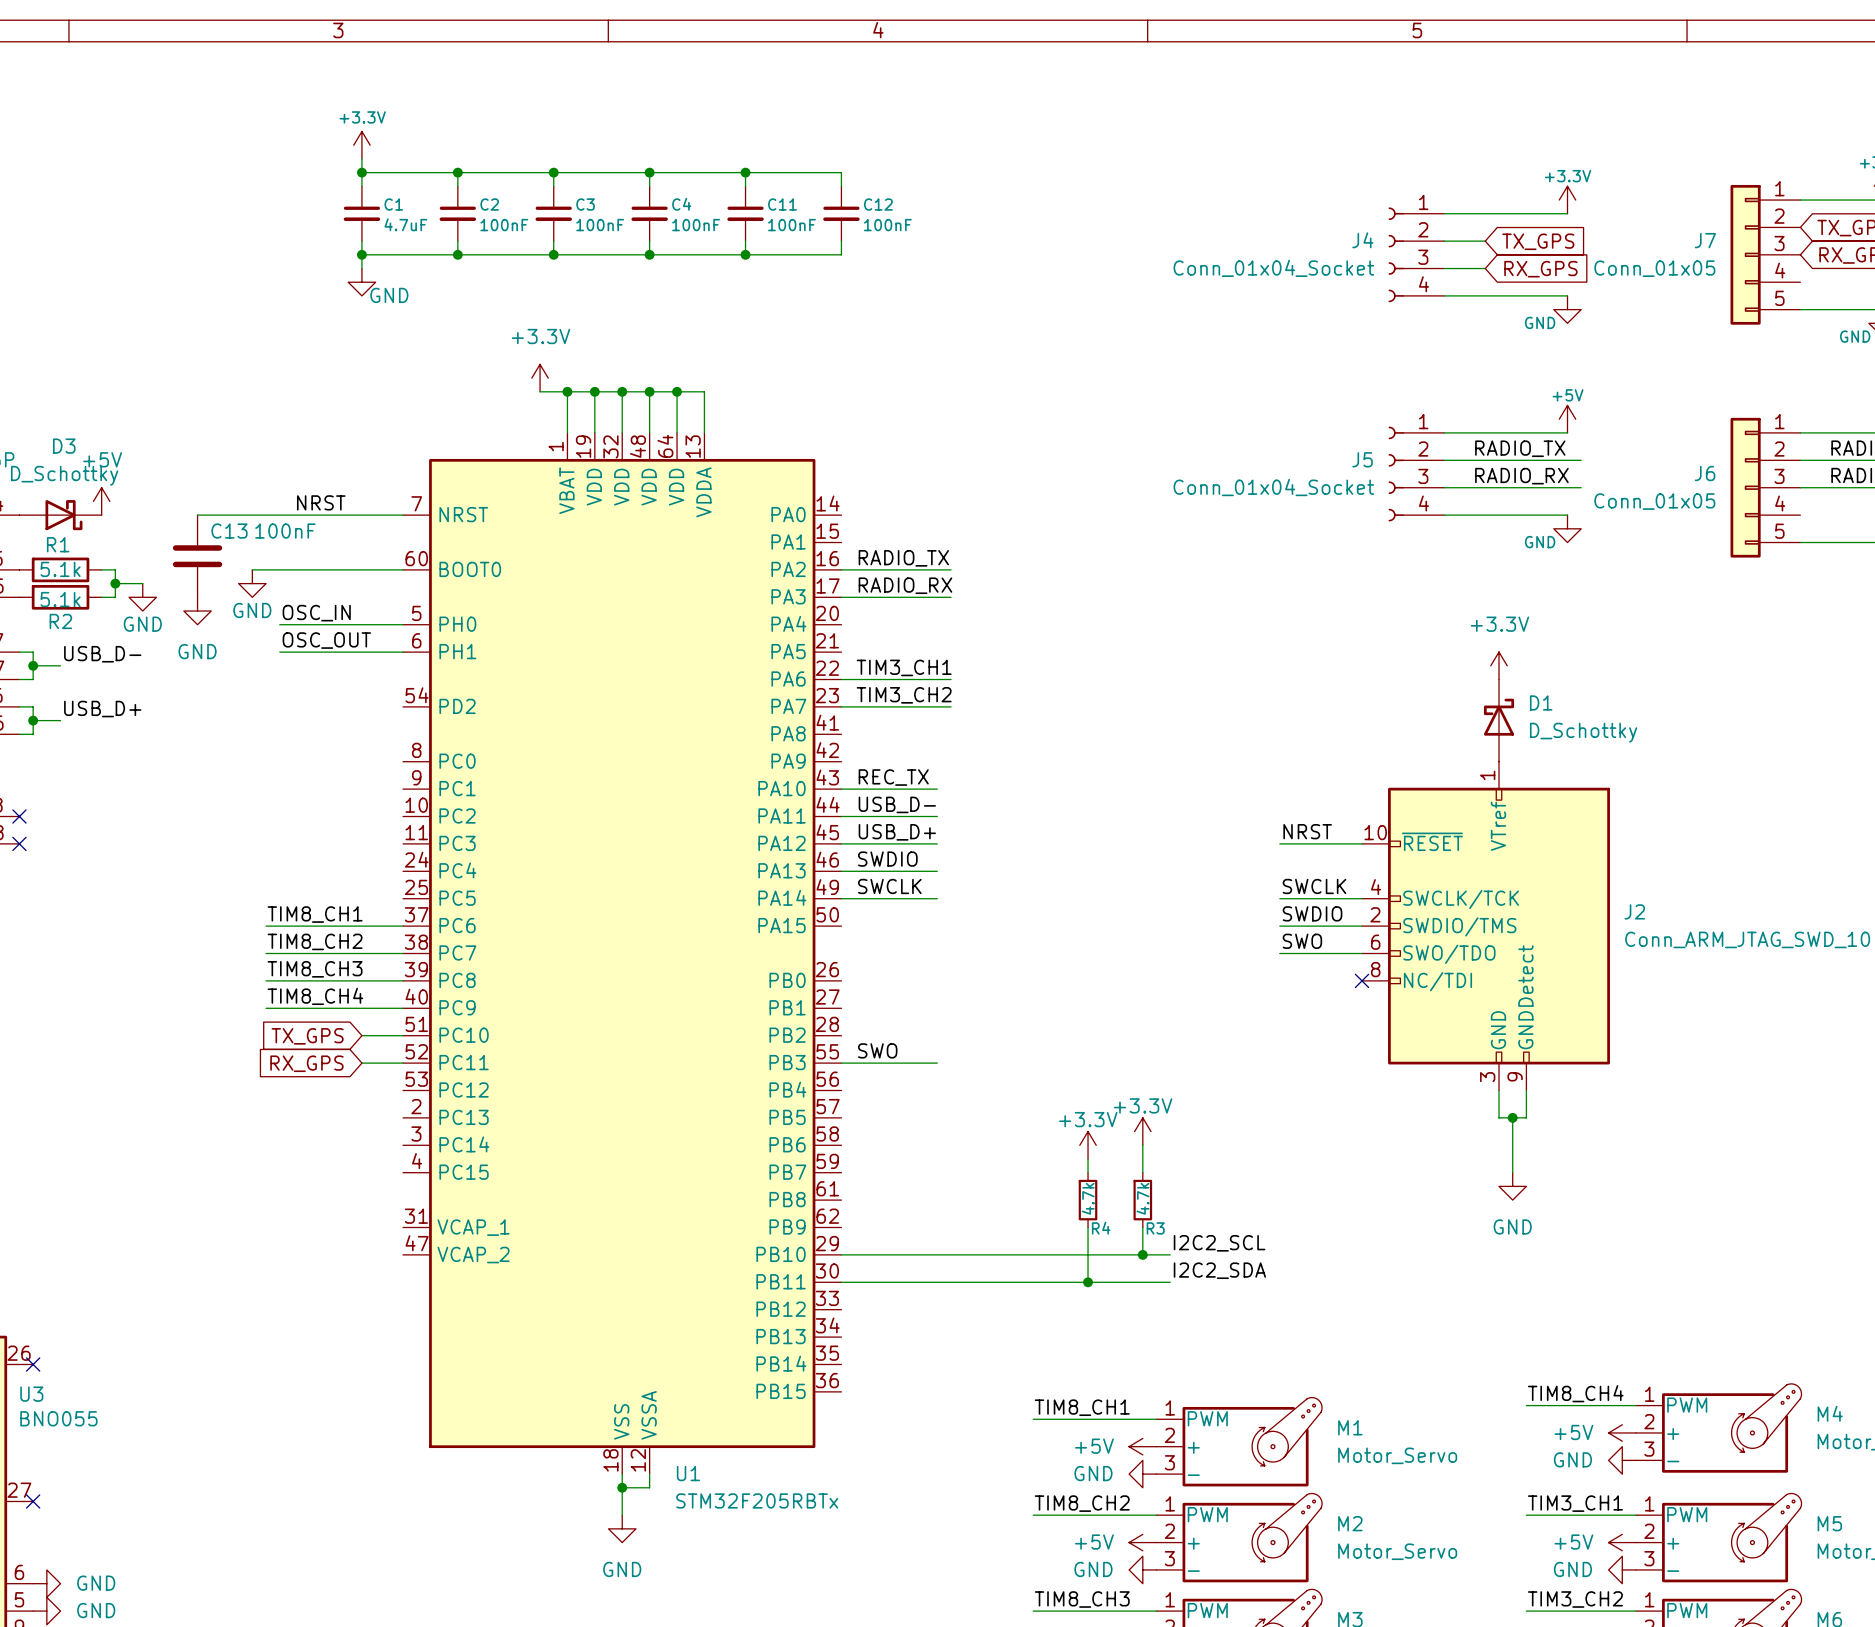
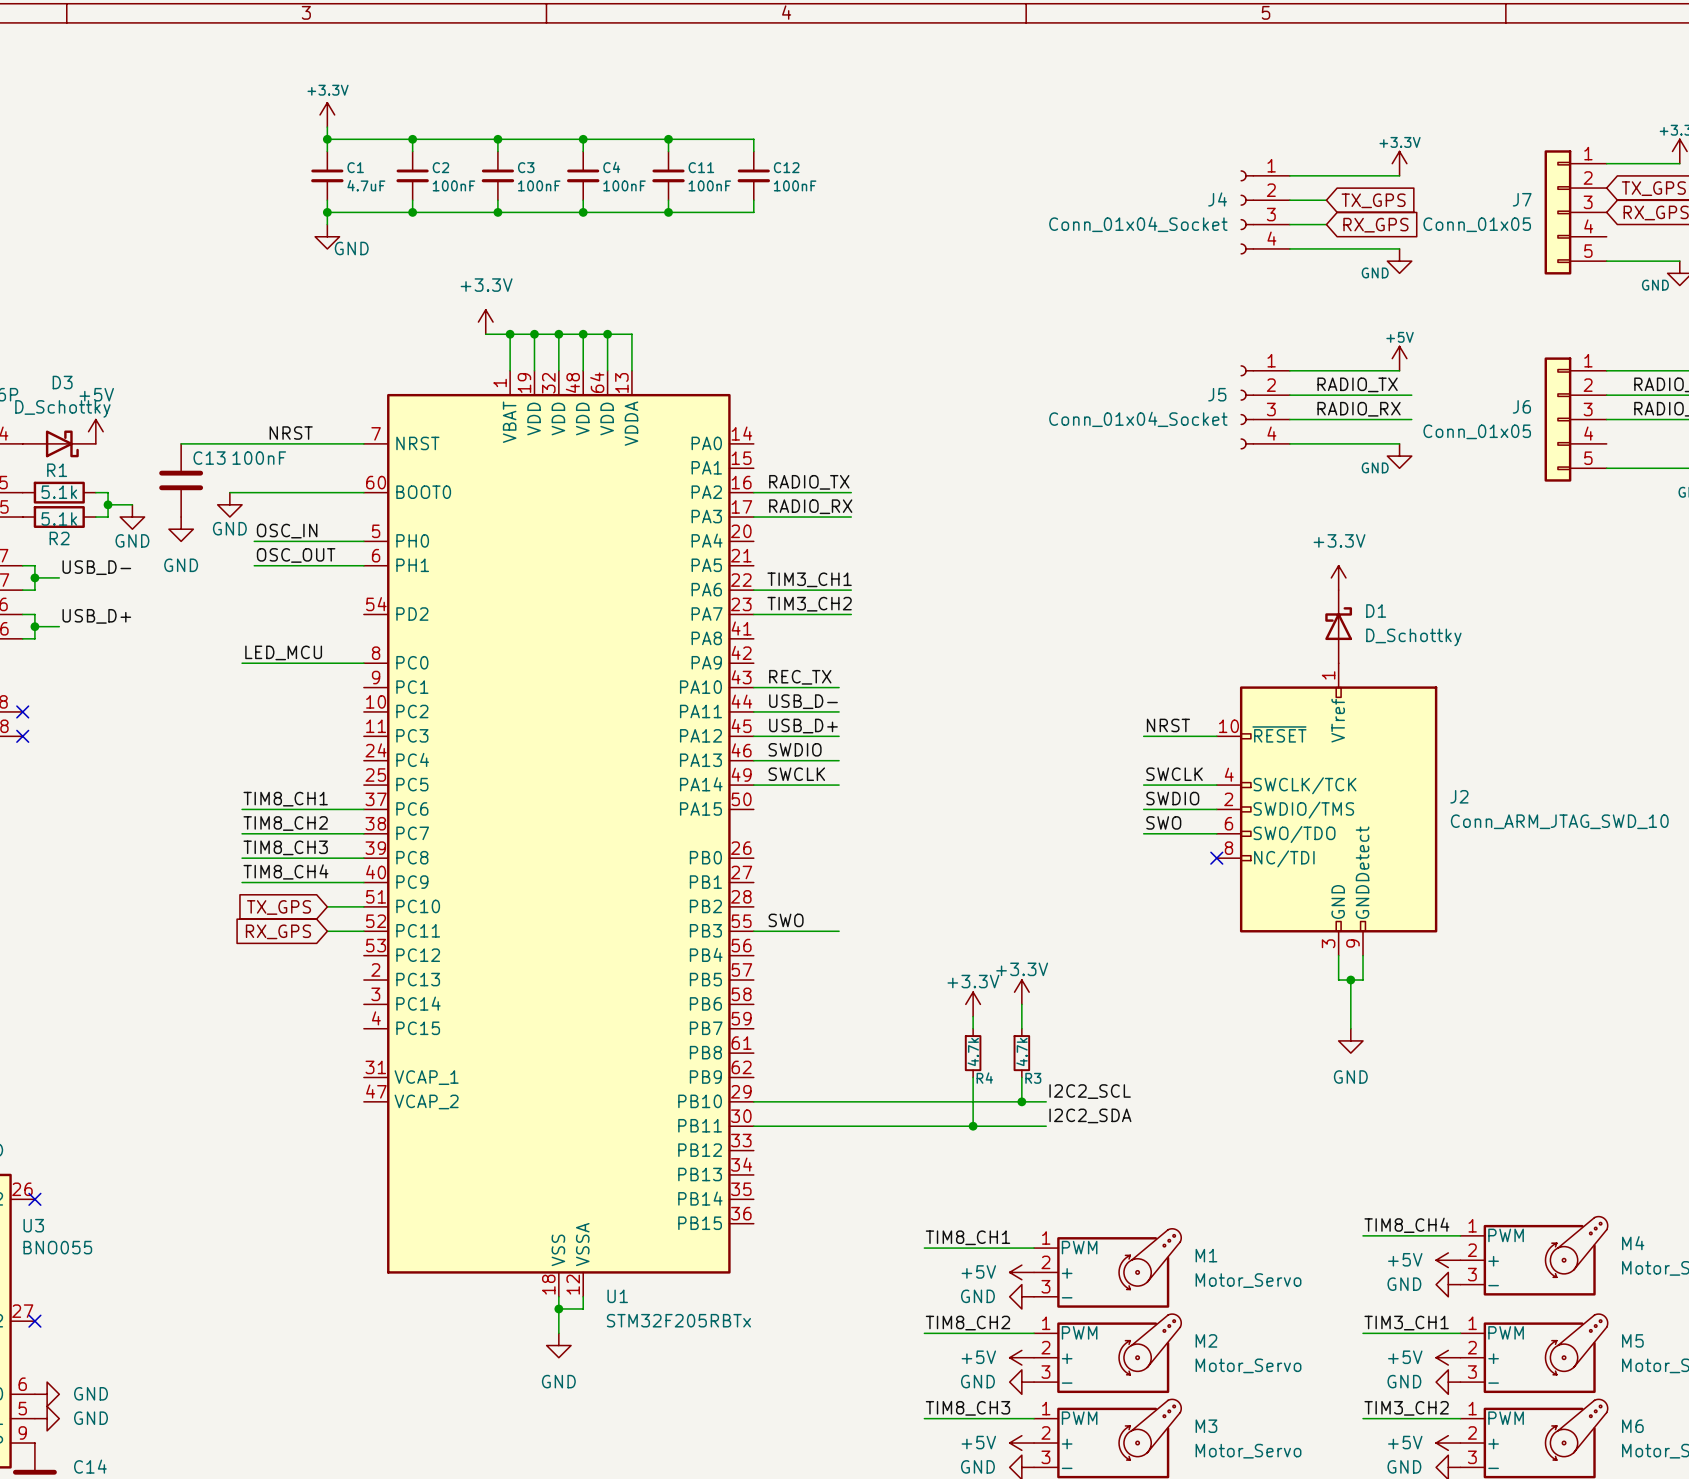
label: none -> LED_MCU (283, 652)
wire: none -> (242, 663) (363, 663)

